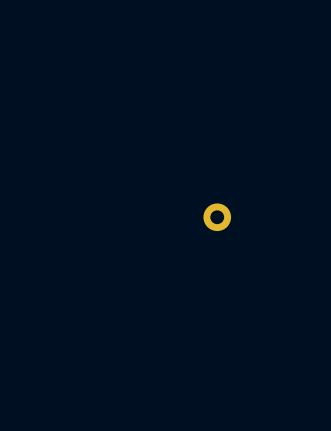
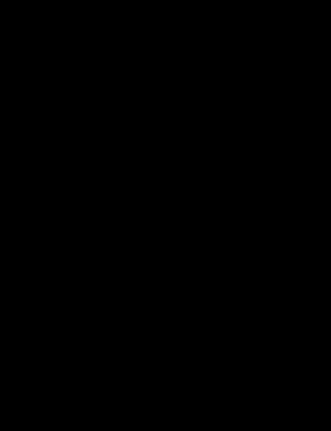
part: (217, 217) -> none

